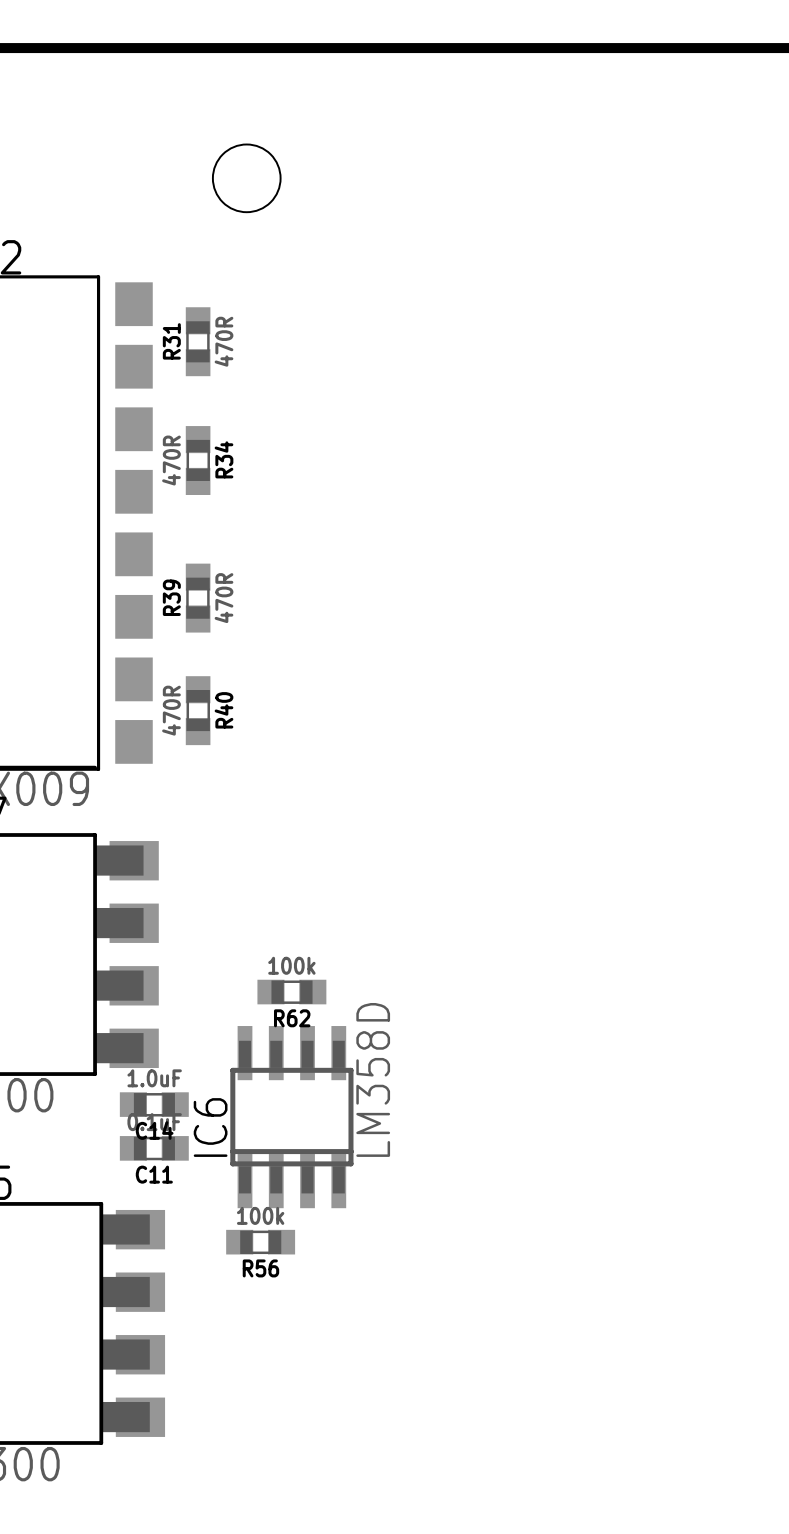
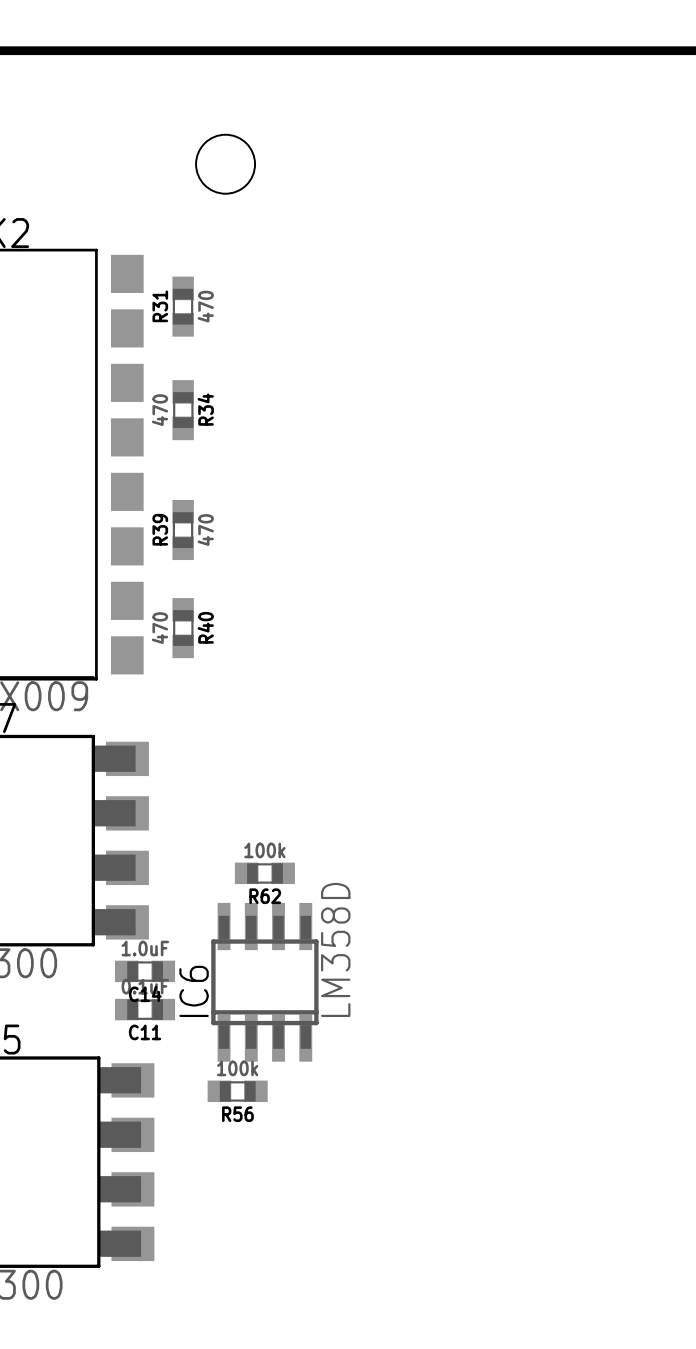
R31 value: 470R (224, 341) -> 470 (205, 306)
R34 value: 470R (171, 460) -> 470 (159, 410)
R39 value: 470R (224, 598) -> 470 (205, 530)
R40 value: 470R (171, 710) -> 470 (159, 628)

